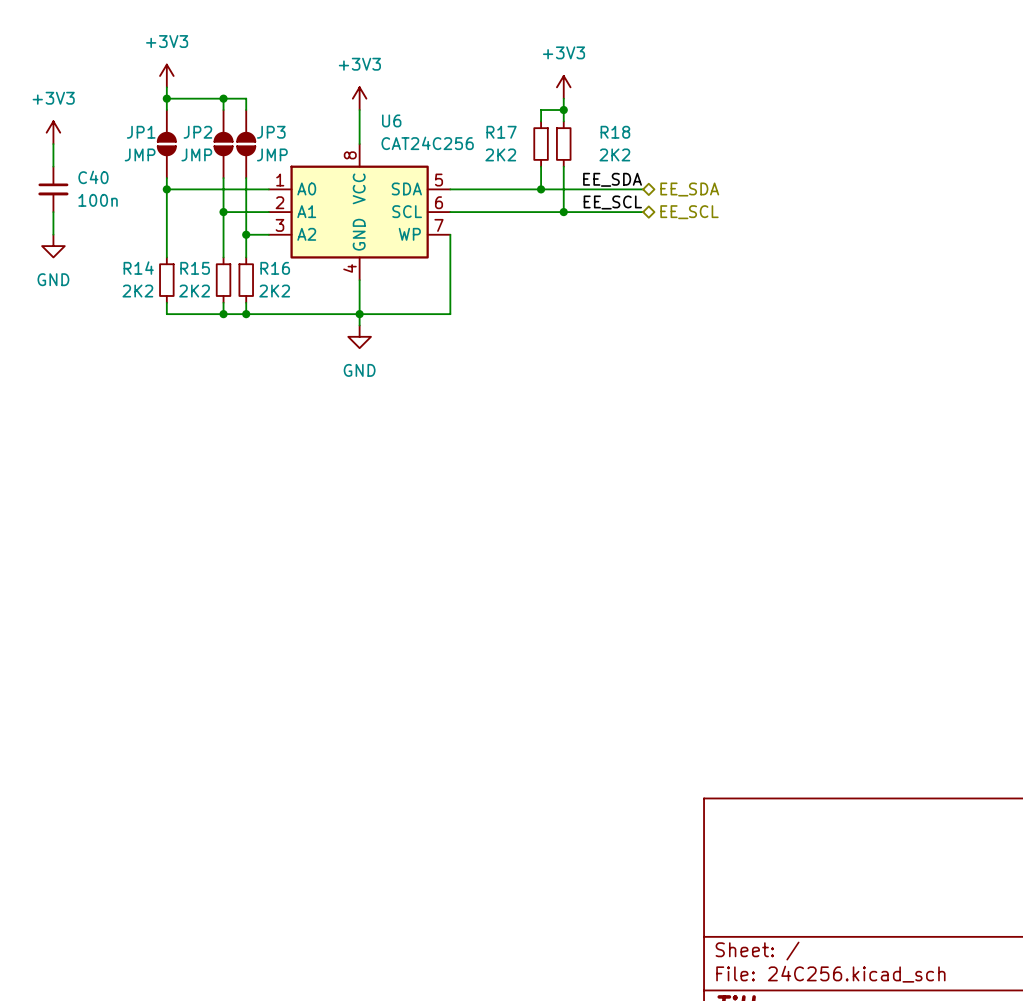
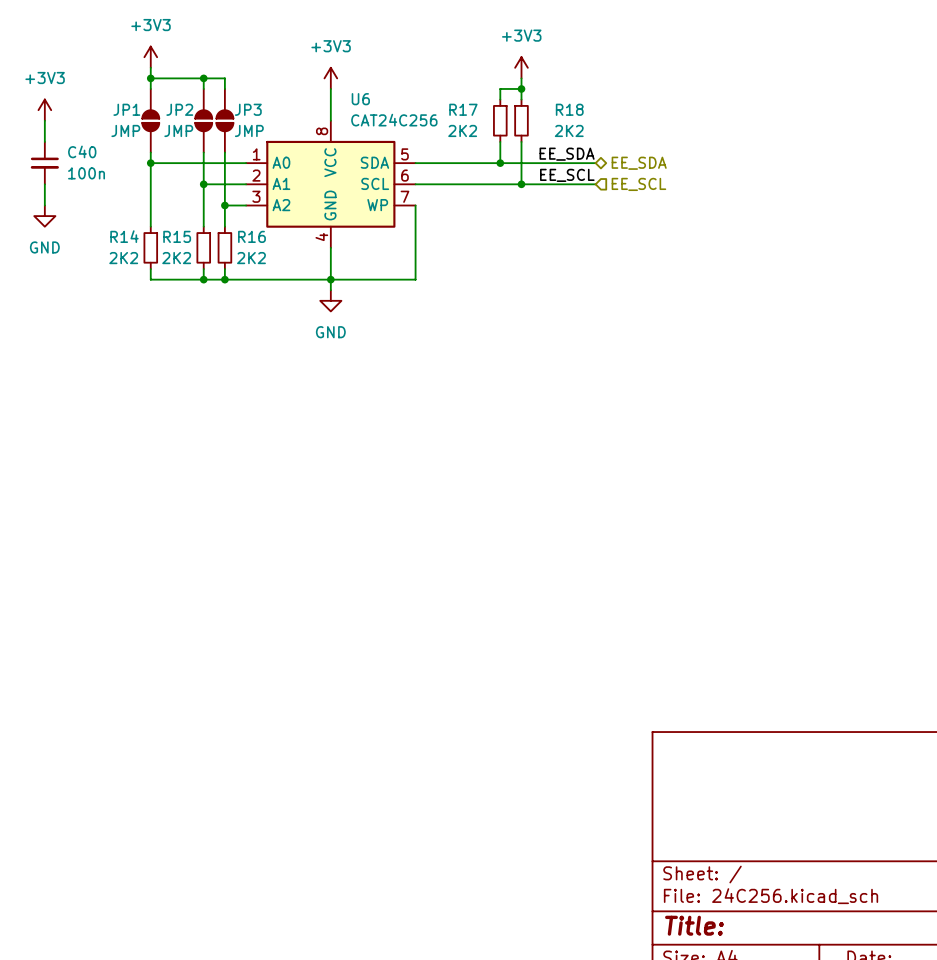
hierarchical label shape: bidirectional (689, 212) -> input (638, 184)

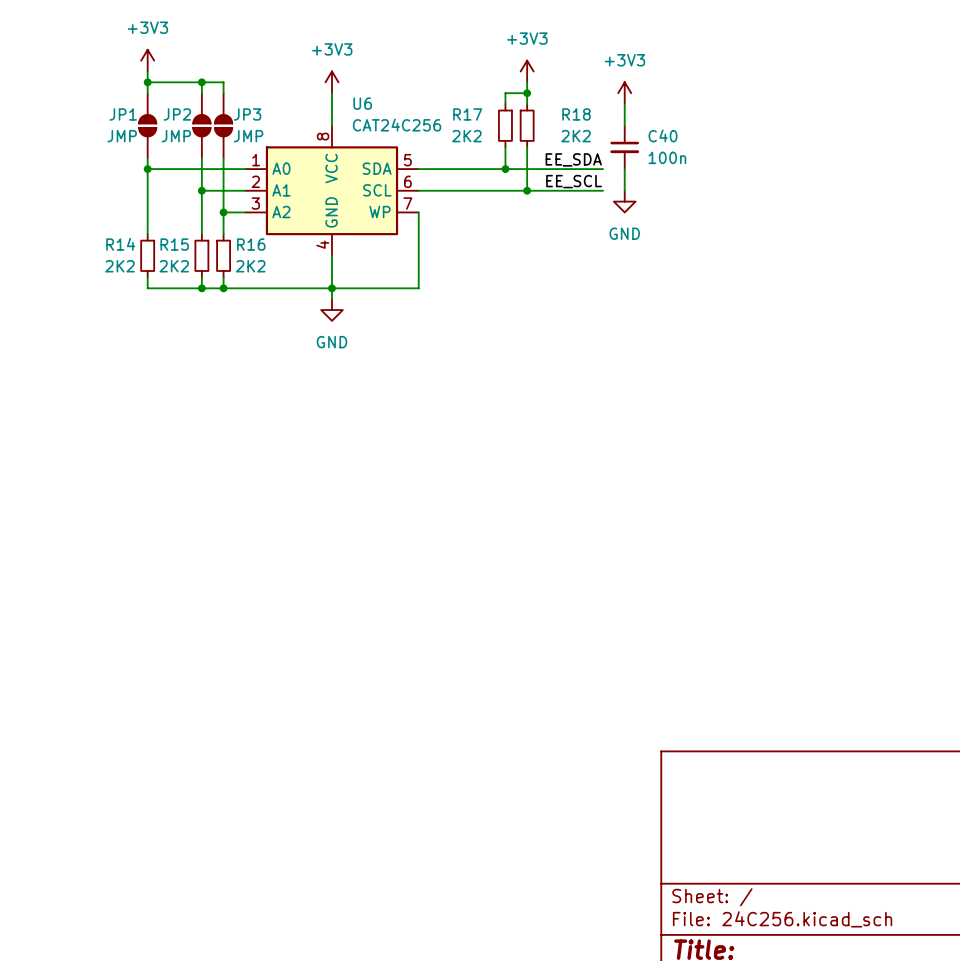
power symbol: none -> +3V3 (624, 93)
wire: none -> (624, 104) (624, 125)
power symbol: +3V3 (44, 110) -> none
wire: (44, 120) (44, 141) -> none
C40 position: (44, 163) -> (624, 147)
wire: none -> (624, 169) (624, 190)
hierarchical label: EE_SDA (639, 163) -> none
wire: (44, 184) (44, 205) -> none
hierarchical label: EE_SCL (638, 184) -> none
power symbol: none -> GND (624, 201)
power symbol: GND (44, 216) -> none

